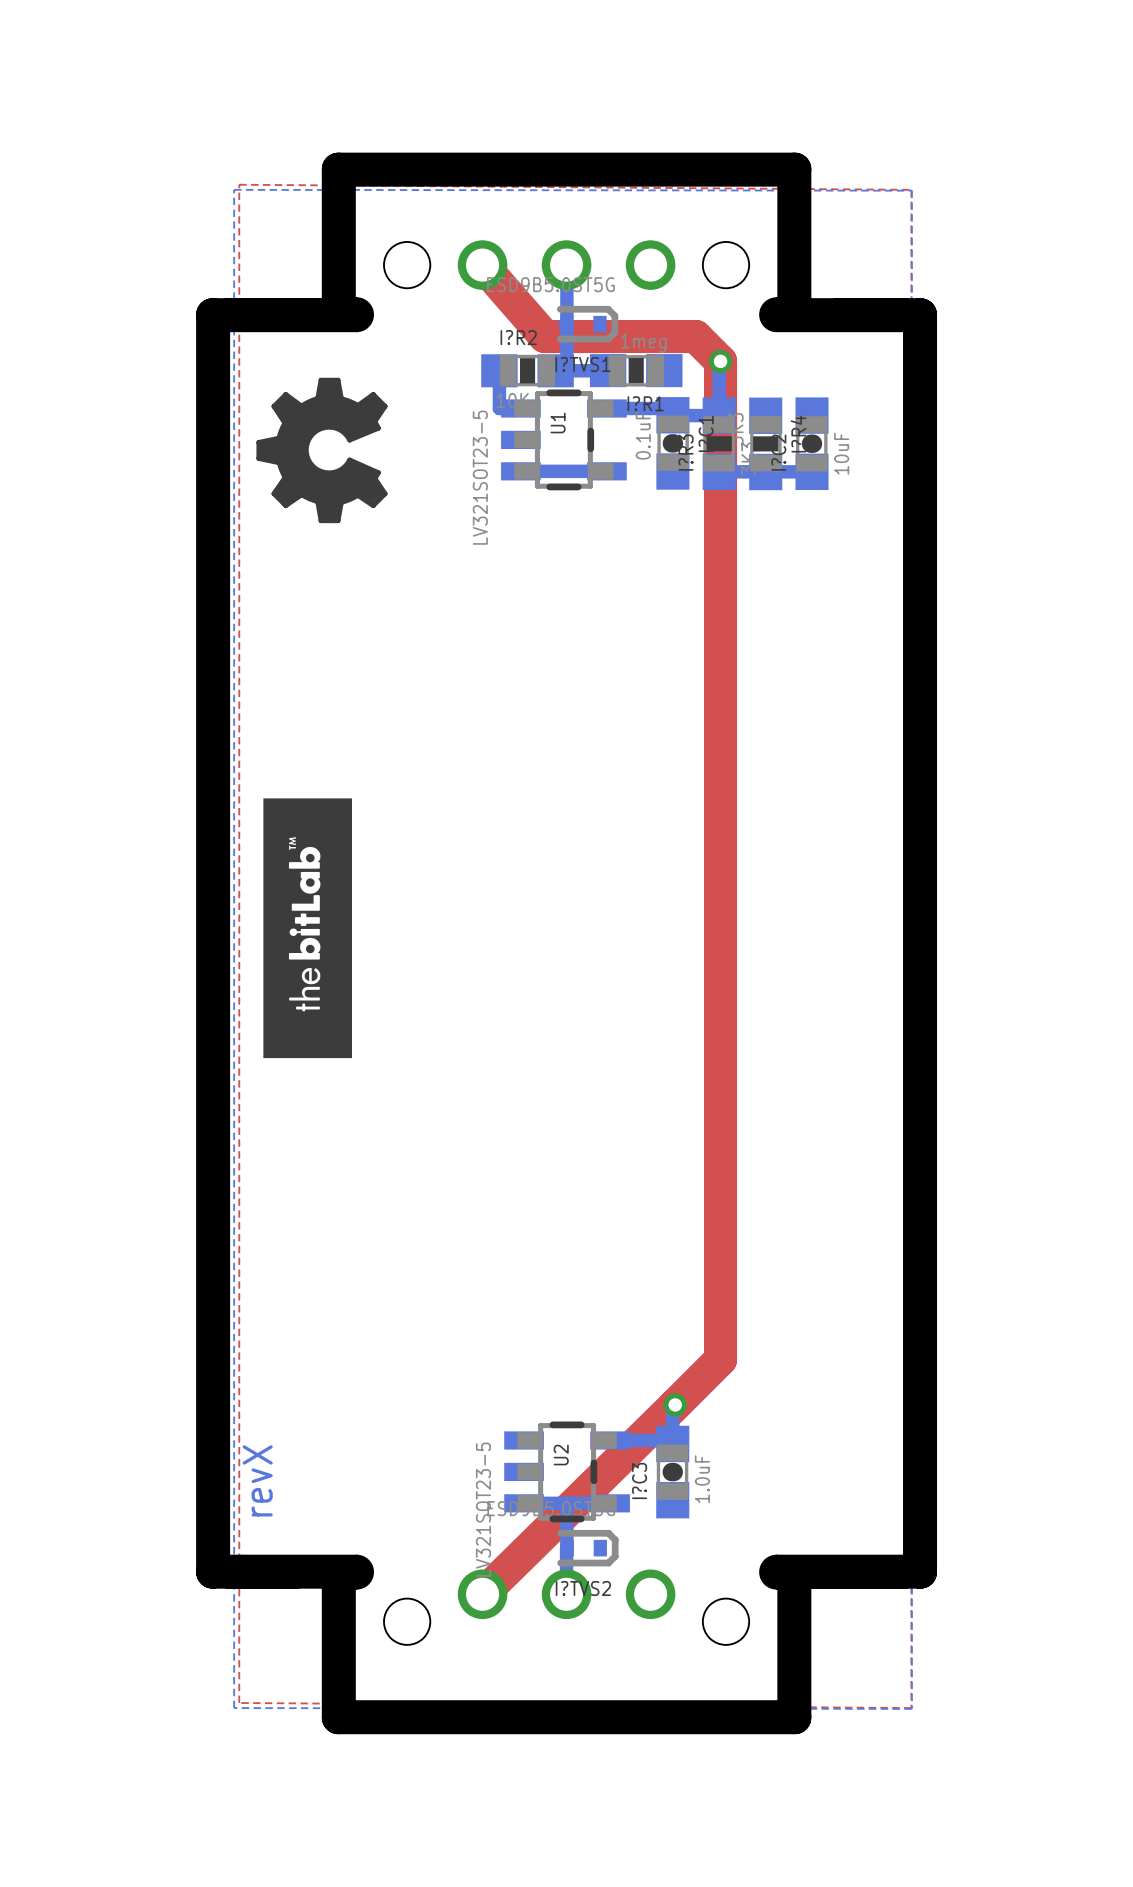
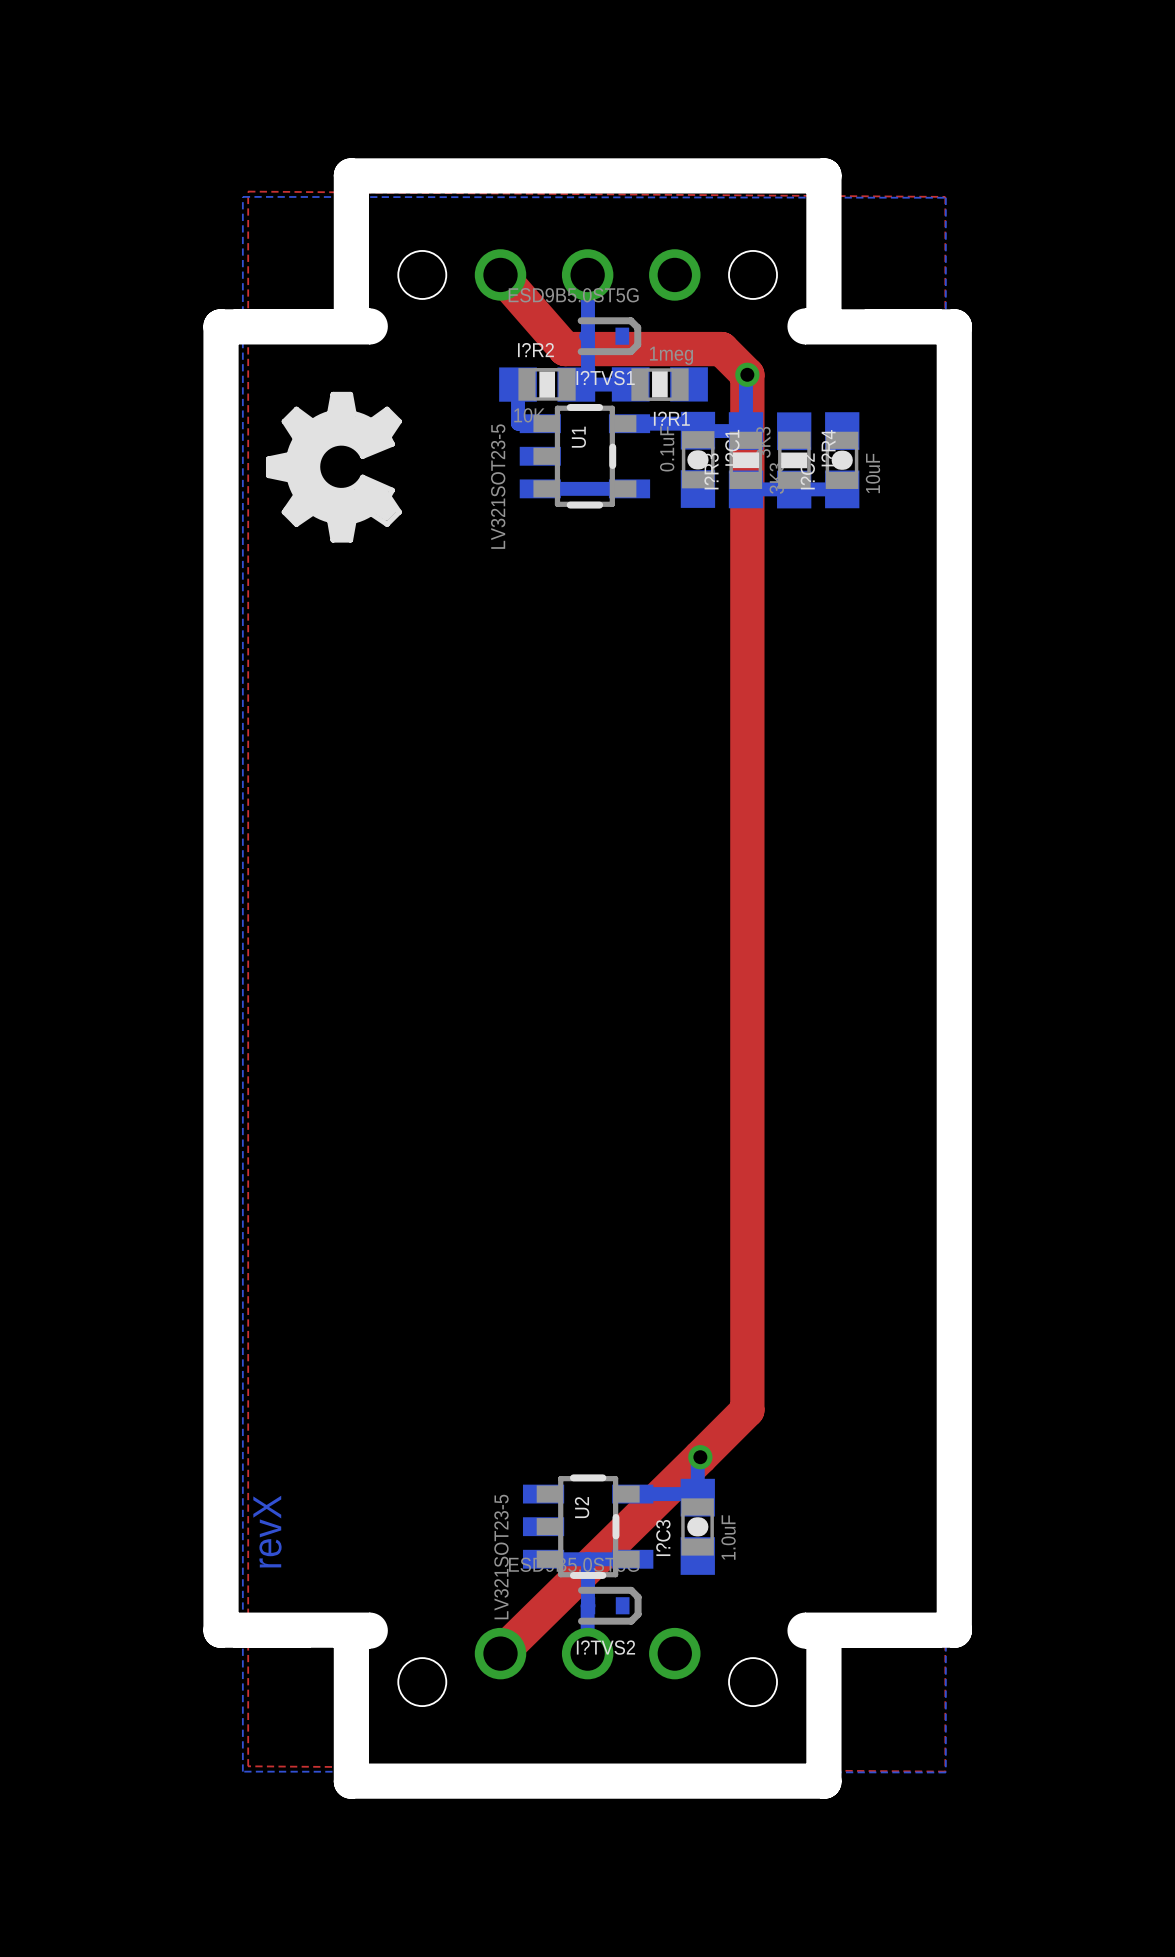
drawing: [263, 798, 352, 1059] -> none

